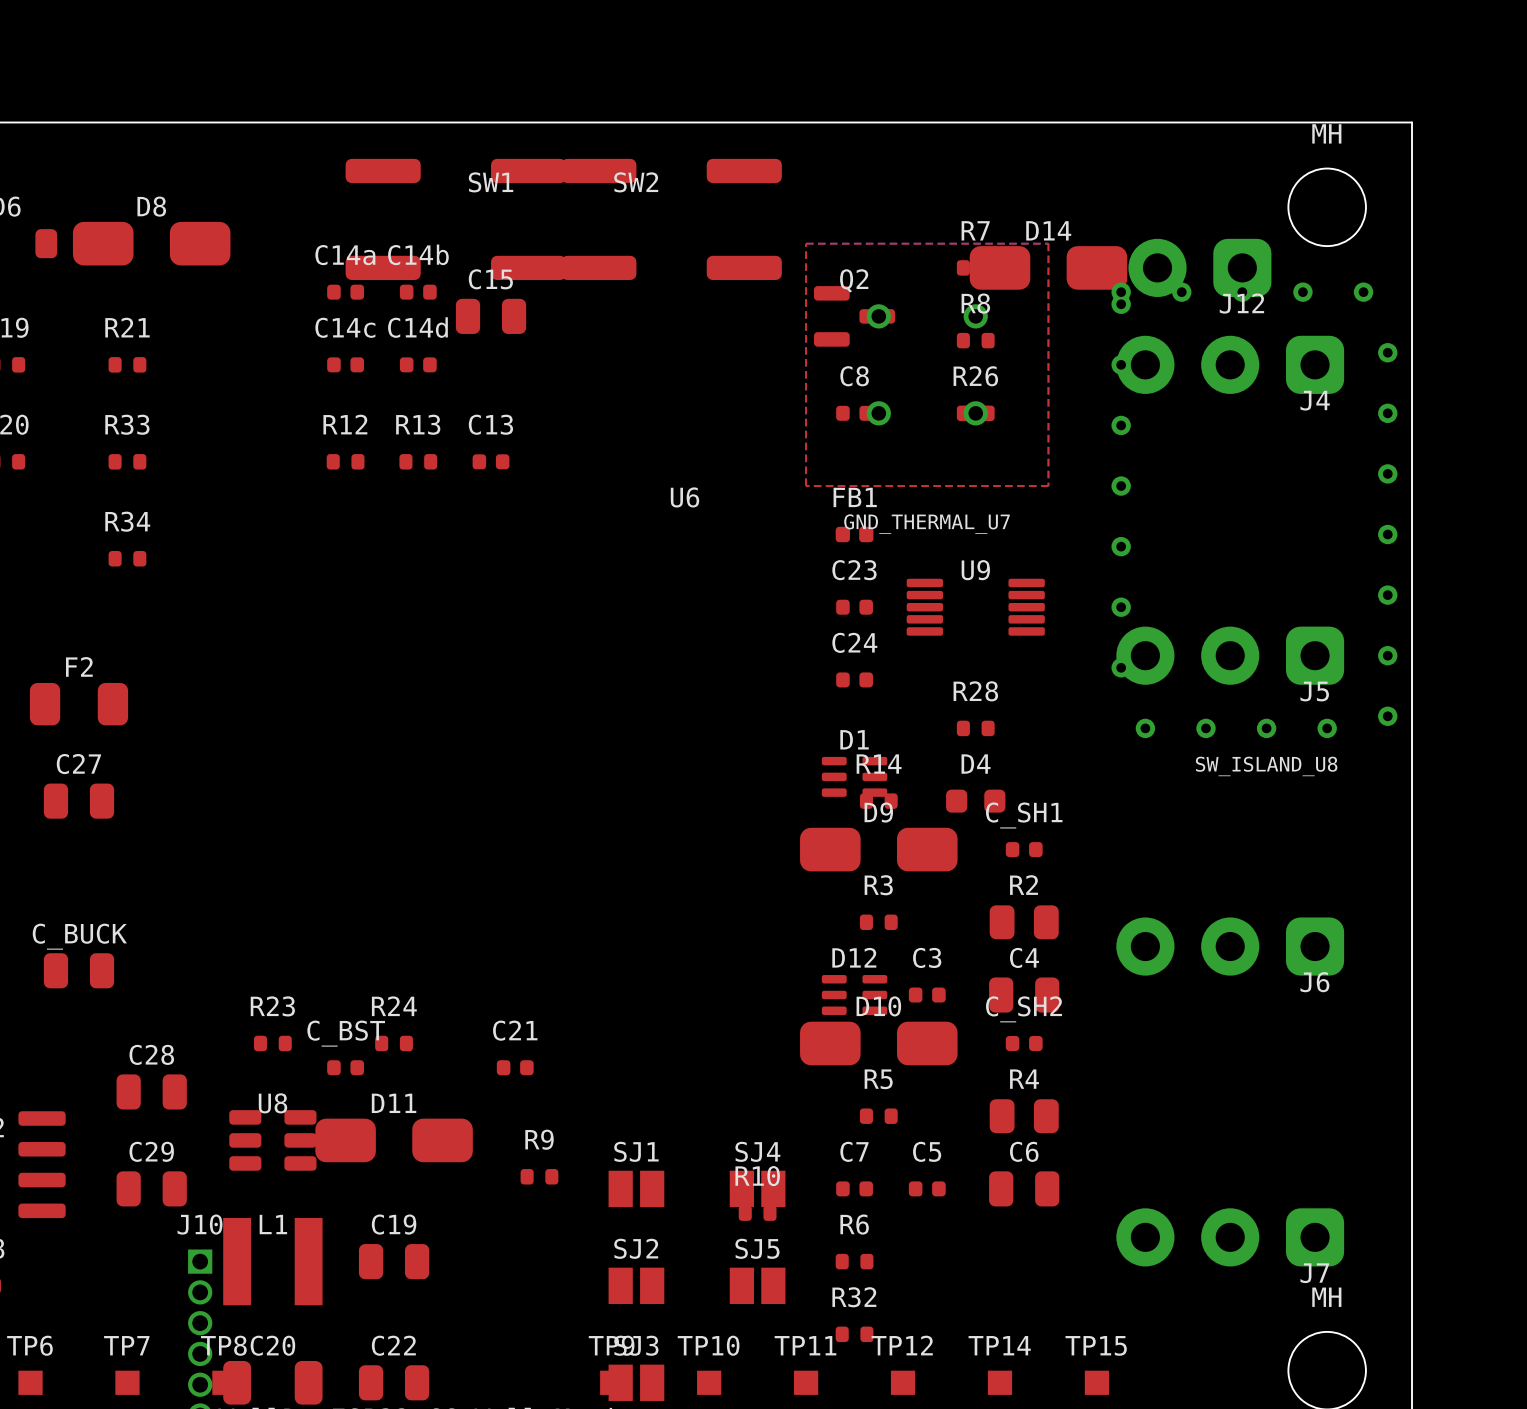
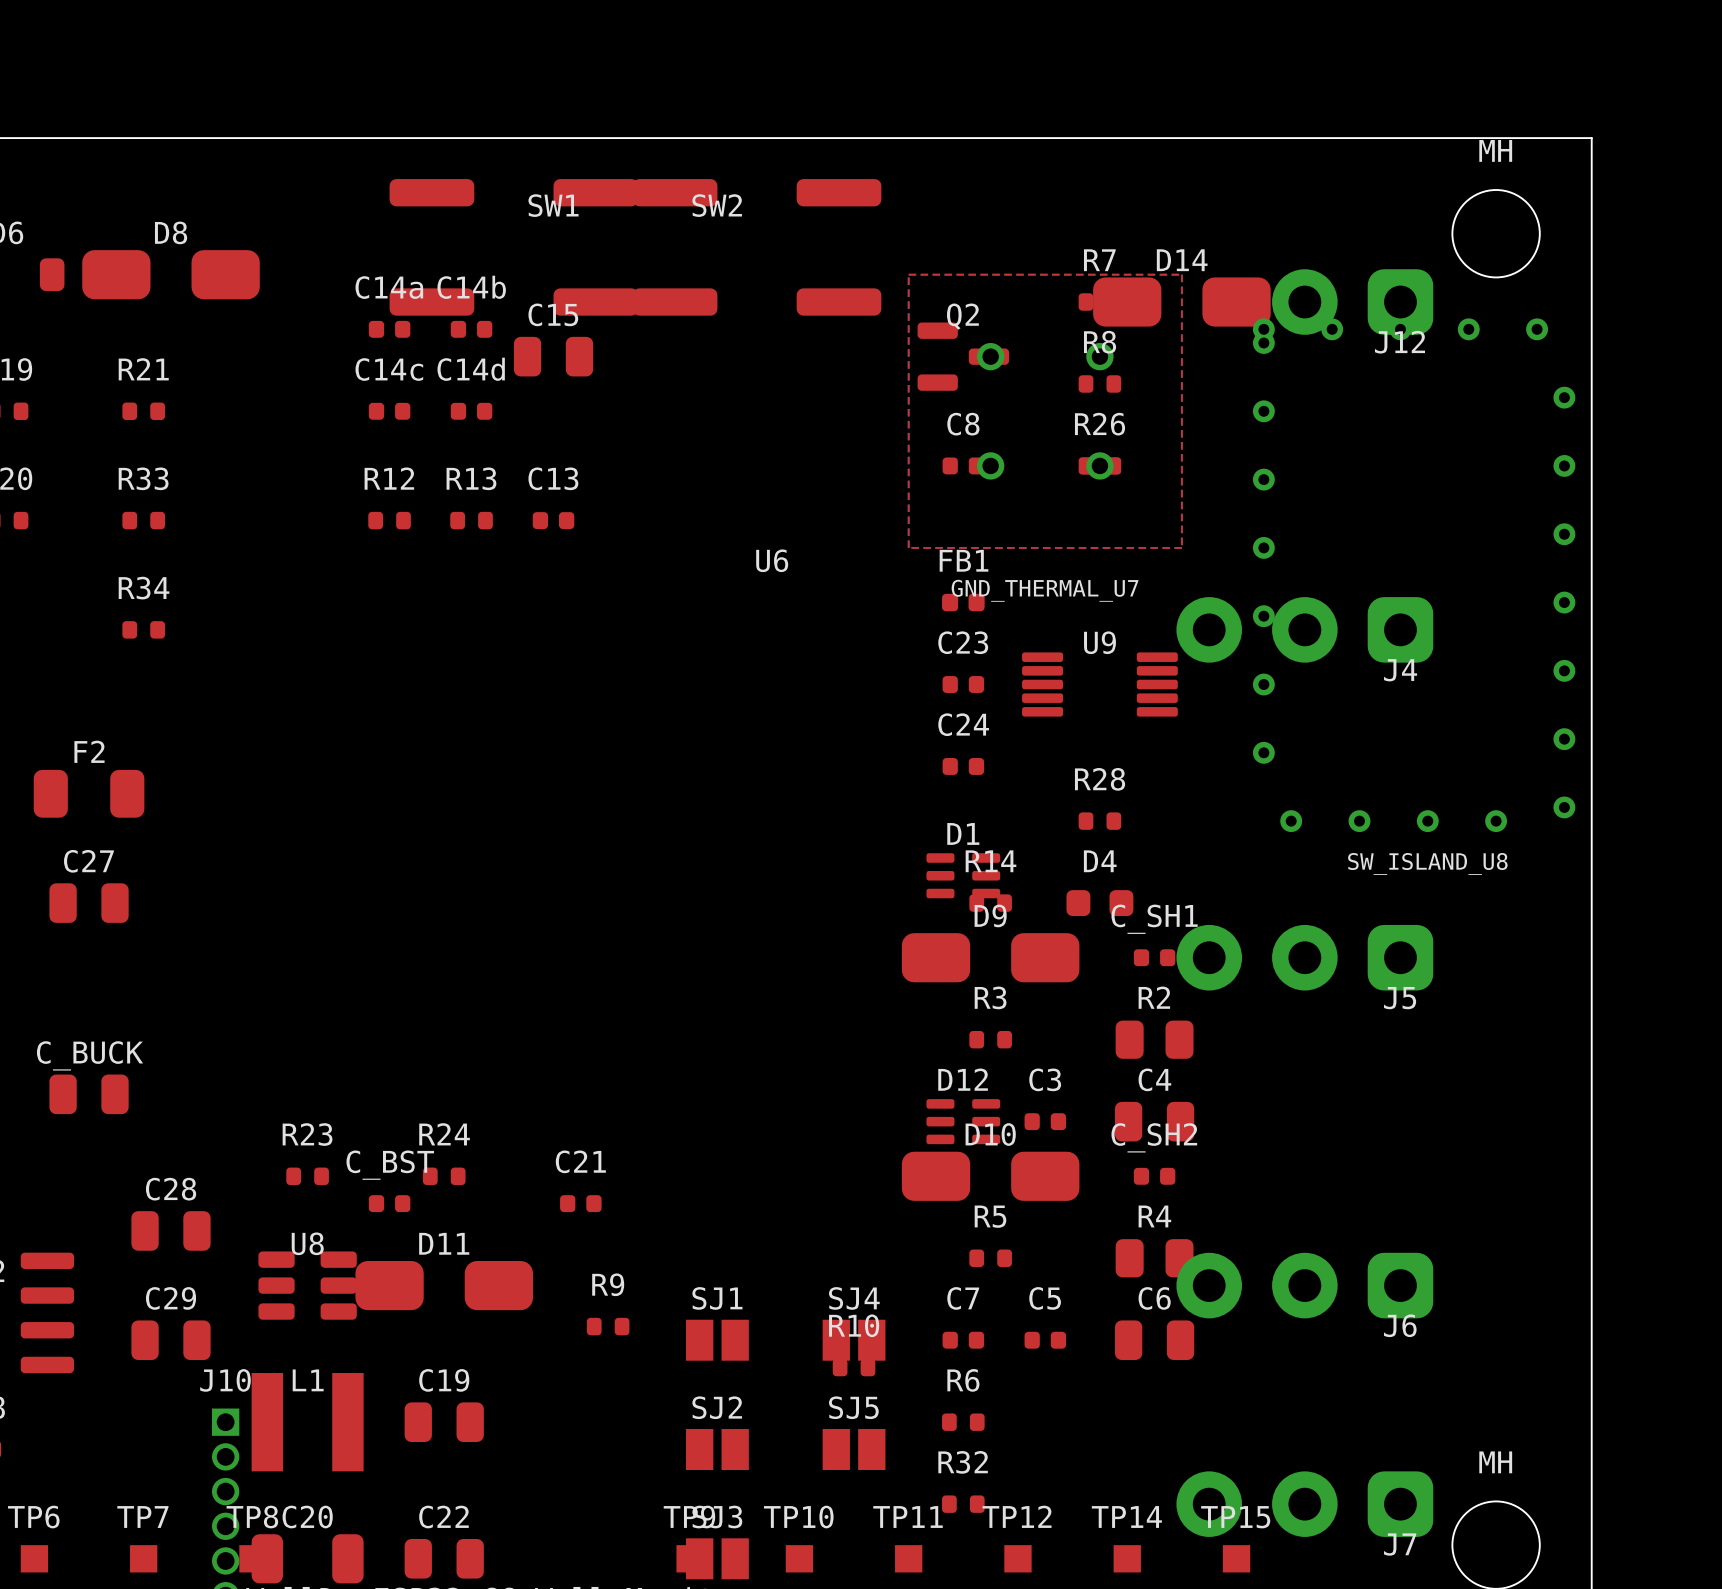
J4 position: (1230, 364) -> (1304, 629)
J5 position: (1230, 655) -> (1304, 957)
J6 position: (1230, 946) -> (1304, 1285)
J7 position: (1230, 1237) -> (1304, 1504)

